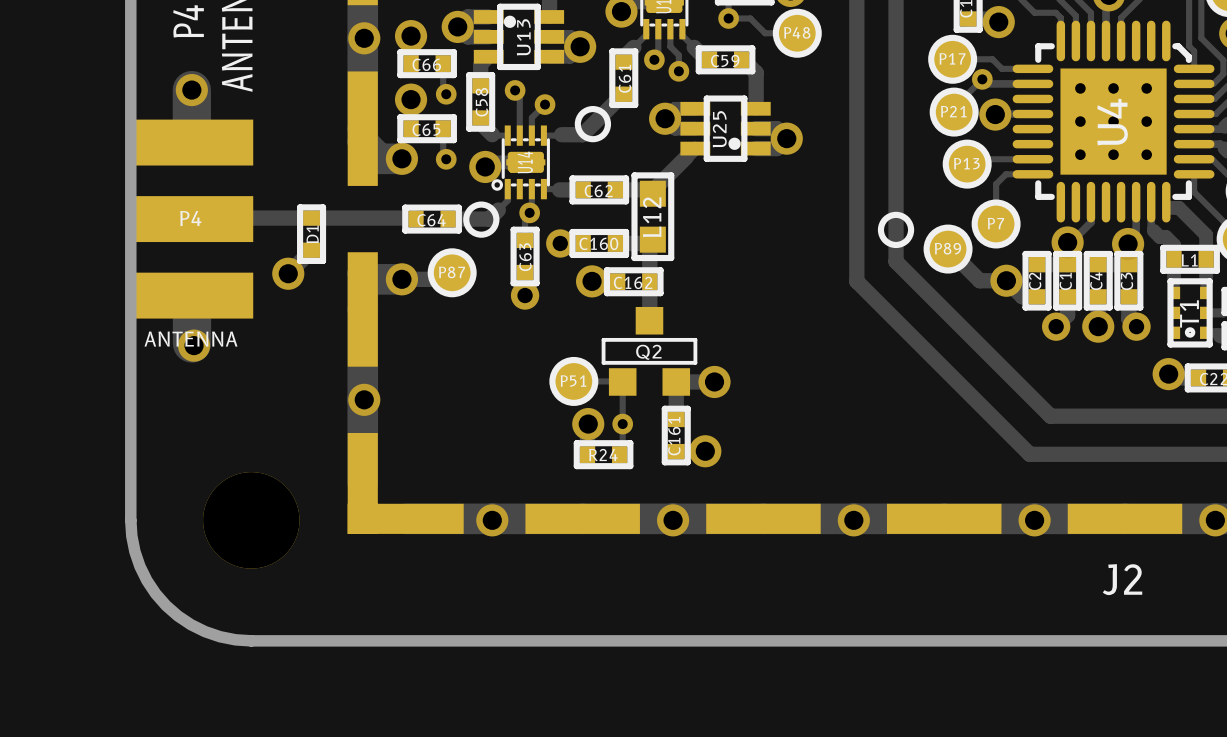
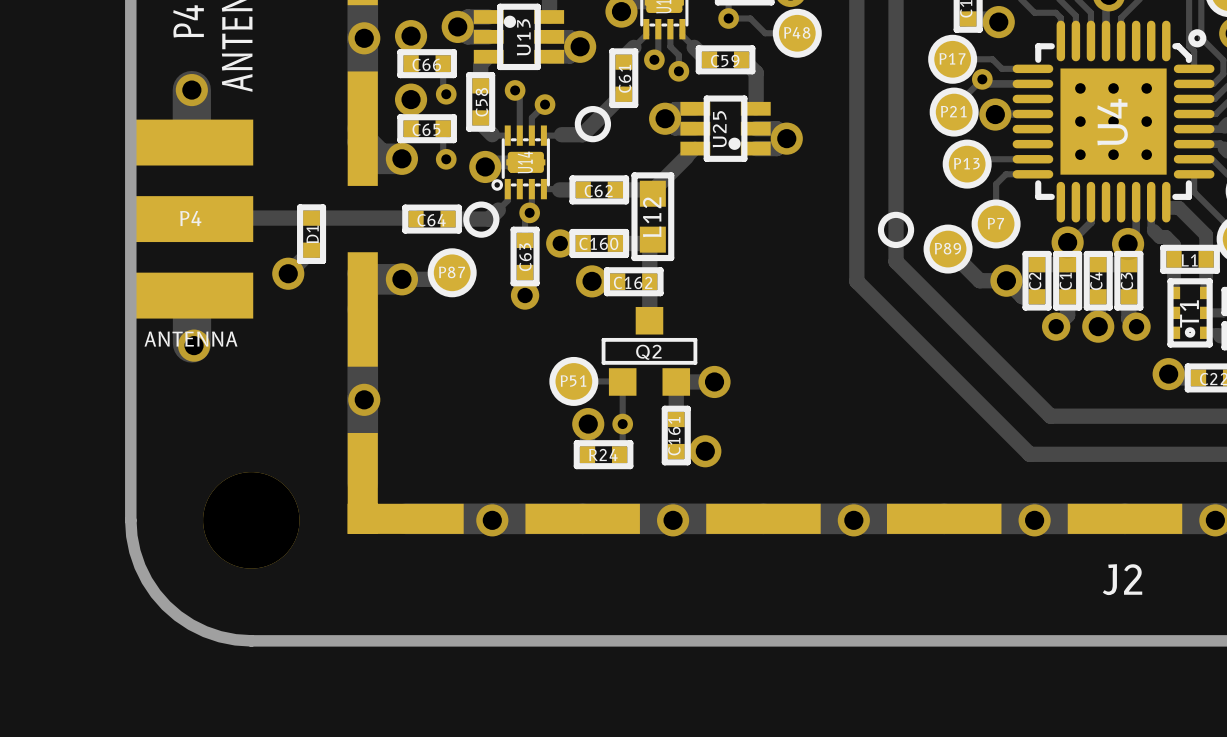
drawing: none -> [1188, 29, 1207, 48]

